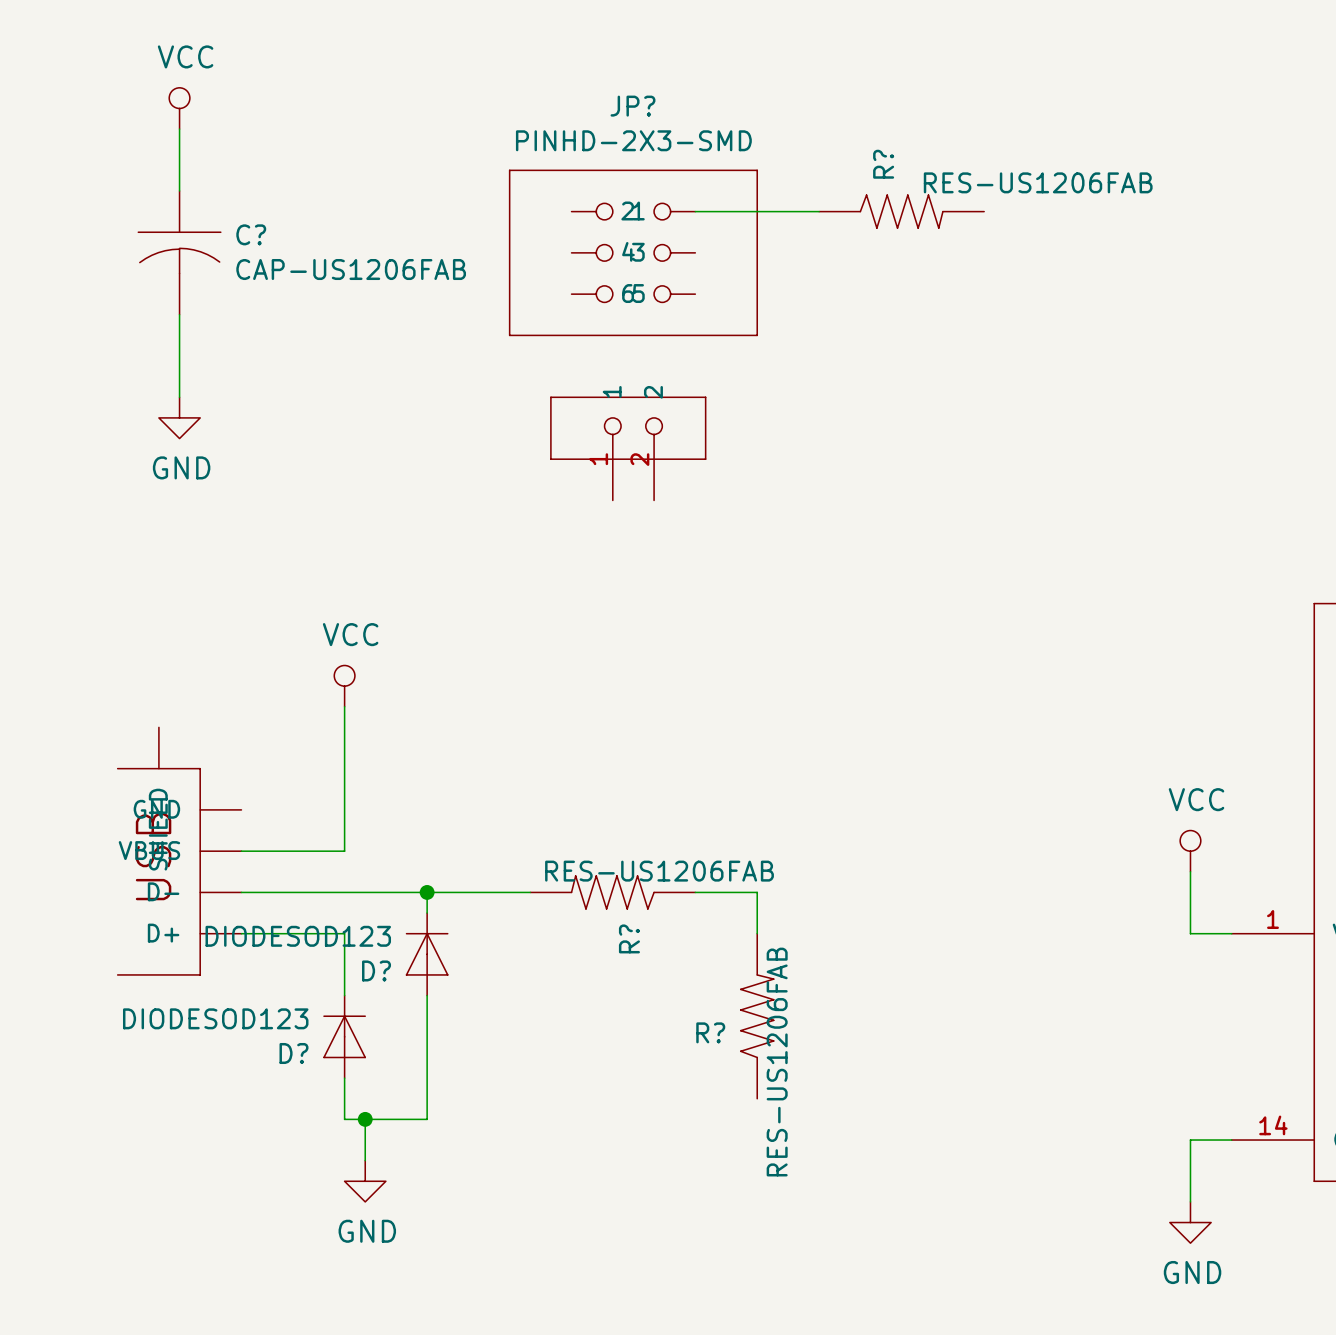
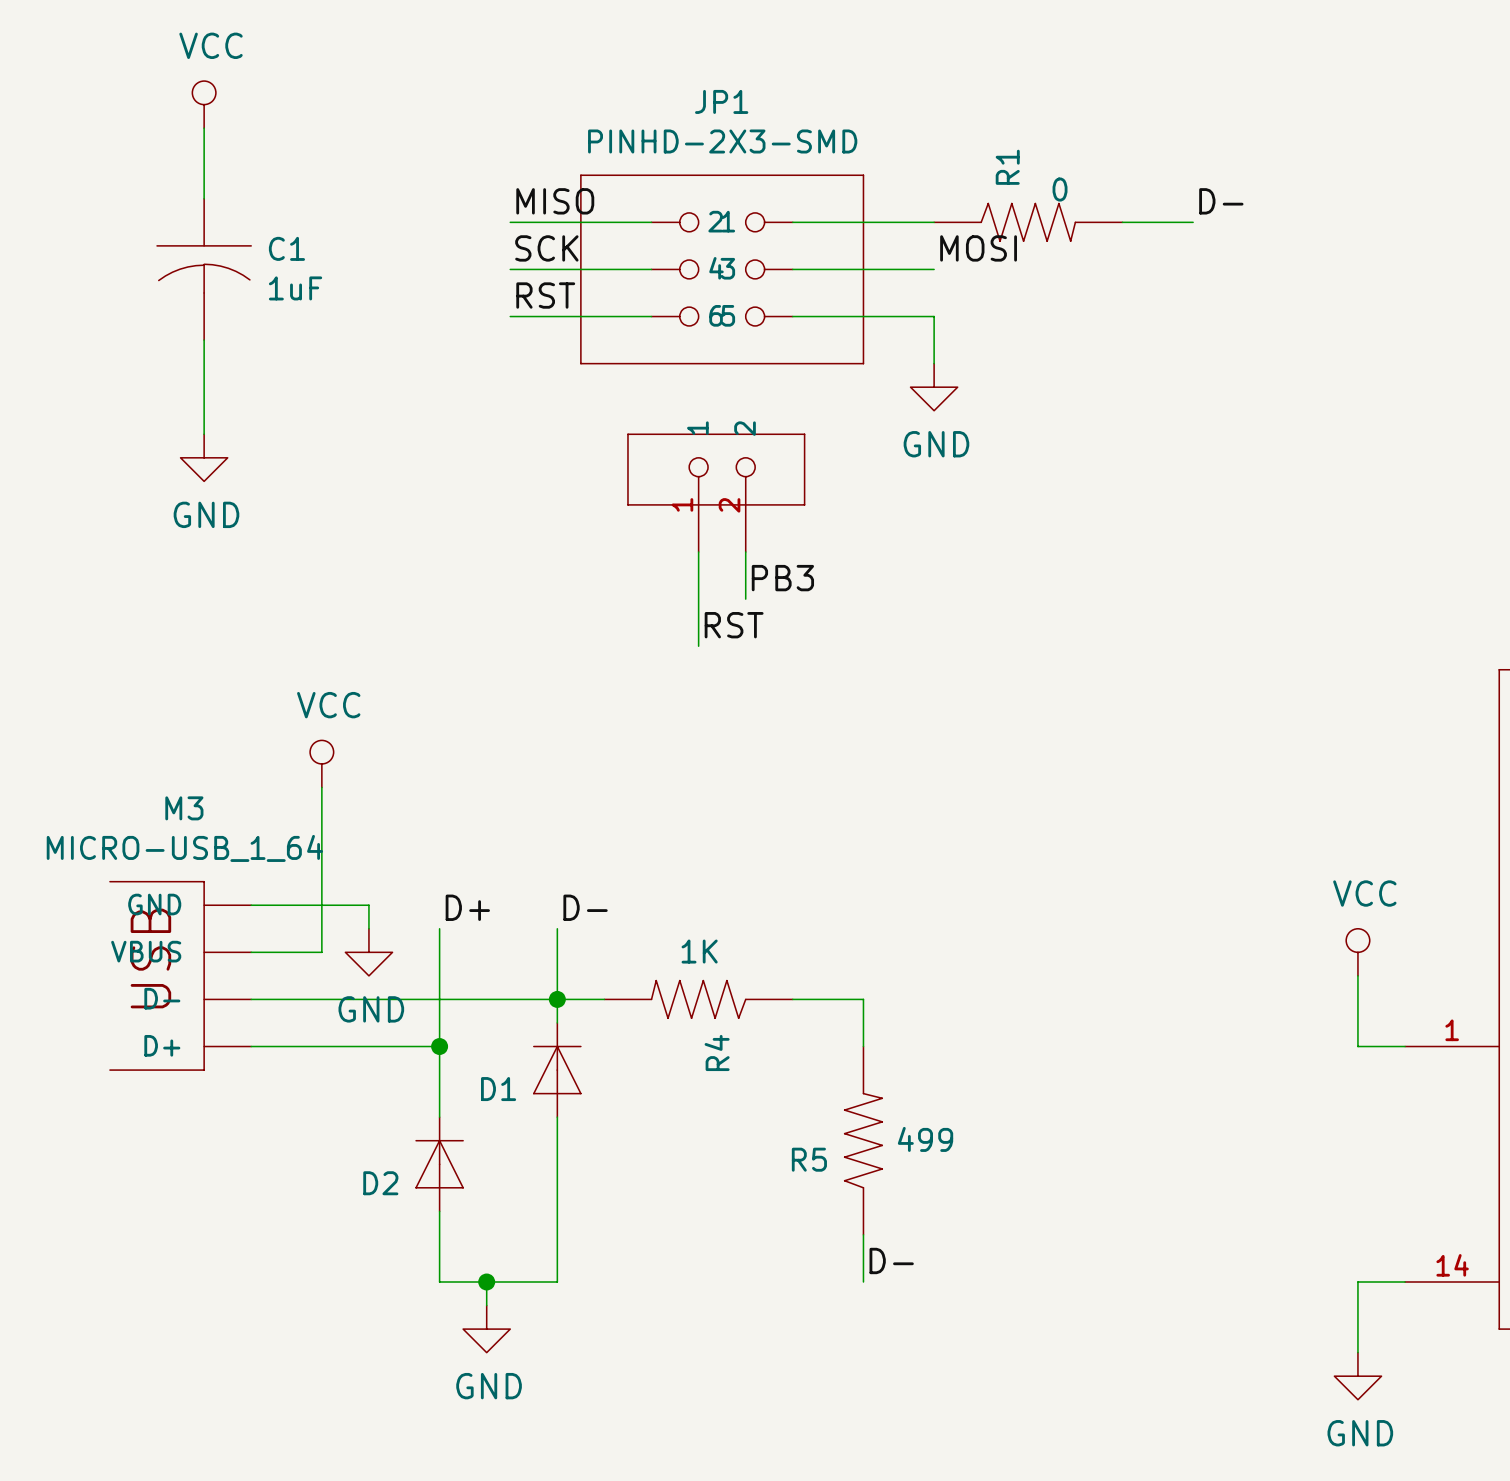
JP? name: JP? (632, 106) -> JP1 (721, 101)
R? name: R? (883, 164) -> R1 (1007, 167)
R? value: RES-US1206FAB (1038, 182) -> 0 (1060, 189)
label: none -> MISO (555, 201)
label: none -> D- (1221, 201)
wire: none -> (510, 222) (651, 222)
wire: none -> (1122, 222) (1193, 222)
C? name: C? (251, 234) -> C1 (286, 248)
label: none -> SCK (546, 248)
label: none -> MOSI (978, 248)
wire: none -> (510, 269) (651, 269)
wire: none -> (792, 269) (934, 269)
C? value: CAP-US1206FAB (351, 269) -> 1uF (295, 288)
label: none -> RST (545, 295)
wire: none -> (510, 316) (651, 316)
wire: none -> (792, 316) (934, 316) (934, 363)
power symbol: none -> GND (934, 387)
wire: none -> (698, 552) (698, 646)
wire: none -> (745, 552) (745, 599)
label: none -> PB3 (782, 578)
label: none -> RST (734, 625)
power symbol position: VCC (344, 686) -> VCC (321, 763)
wire: (344, 706) (344, 851) (282, 851) -> (321, 787) (321, 952)
wire: none -> (251, 905) (368, 905) (368, 928)
label: none -> D+ (467, 907)
label: none -> D- (585, 907)
wire: none -> (439, 928) (439, 1117)
wire: none -> (557, 928) (557, 1022)
part: (179, 851) -> none
power symbol: none -> GND (368, 952)
M3: none -> MICRO-USB_1_64 (180, 975)
R? value: RES-US1206FAB (659, 871) -> 1K (699, 951)
wire: (427, 892) (427, 913) -> (486, 1282) (486, 1305)
junction: (427, 892) -> none
junction: none -> (557, 999)
wire: (344, 933) (344, 995) -> (392, 1046) (439, 1046)
junction: none -> (439, 1046)
R? name: R? (629, 938) -> R4 (717, 1052)
D?: DIODESOD123 (427, 954) -> none
D1: none -> (557, 1070)
wire: (427, 995) (427, 1119) (344, 1119) (344, 1078) -> none
wire: none -> (557, 1117) (557, 1282) (439, 1282) (439, 1211)
R? name: R? (710, 1032) -> R5 (809, 1159)
D?: DIODESOD123 (344, 1036) -> none
D2: none -> (439, 1164)
R? value: RES-US1206FAB (777, 1062) -> 499 (925, 1139)
wire: (365, 1119) (365, 1160) -> (863, 1234) (863, 1282)
junction position: (365, 1119) -> (486, 1282)
label: none -> D- (891, 1260)
power symbol position: GND (365, 1181) -> GND (486, 1329)

